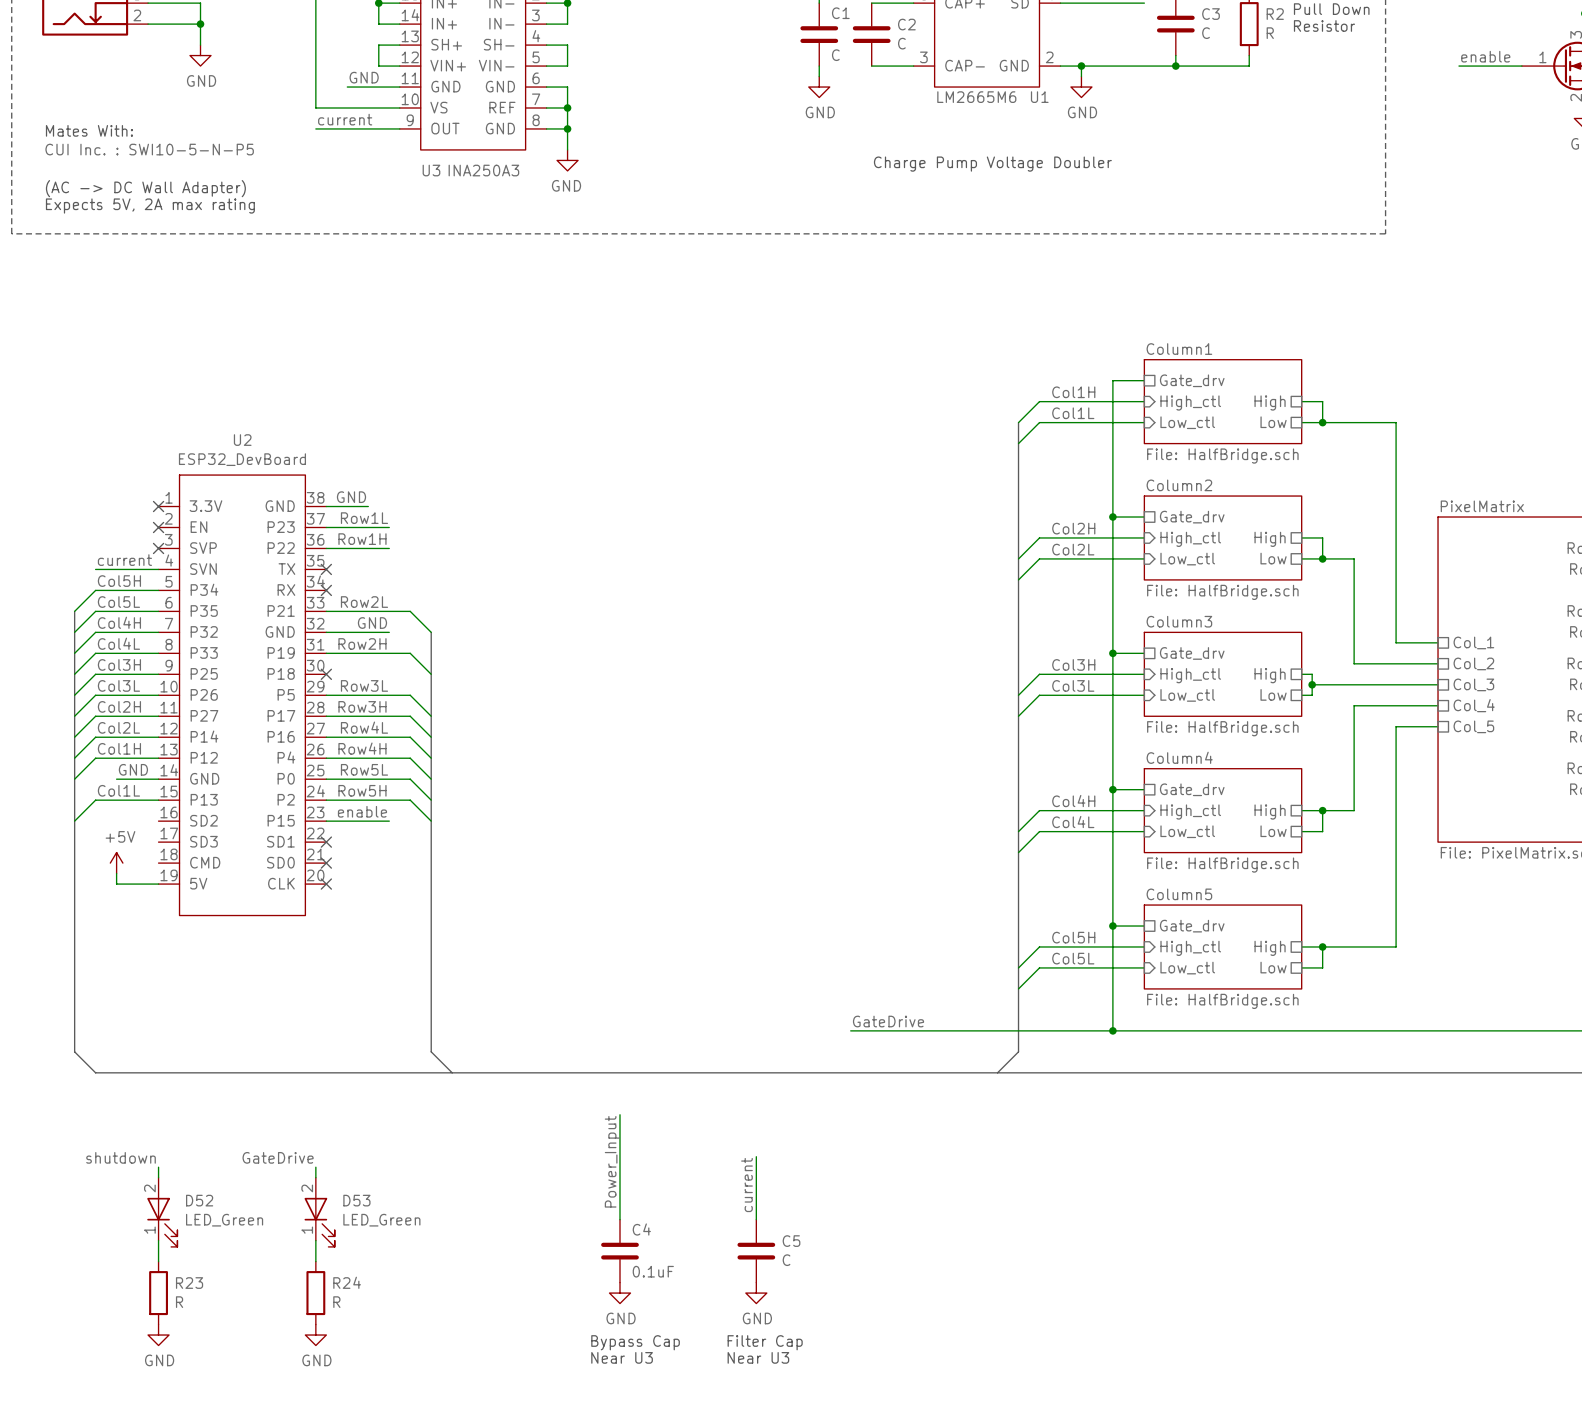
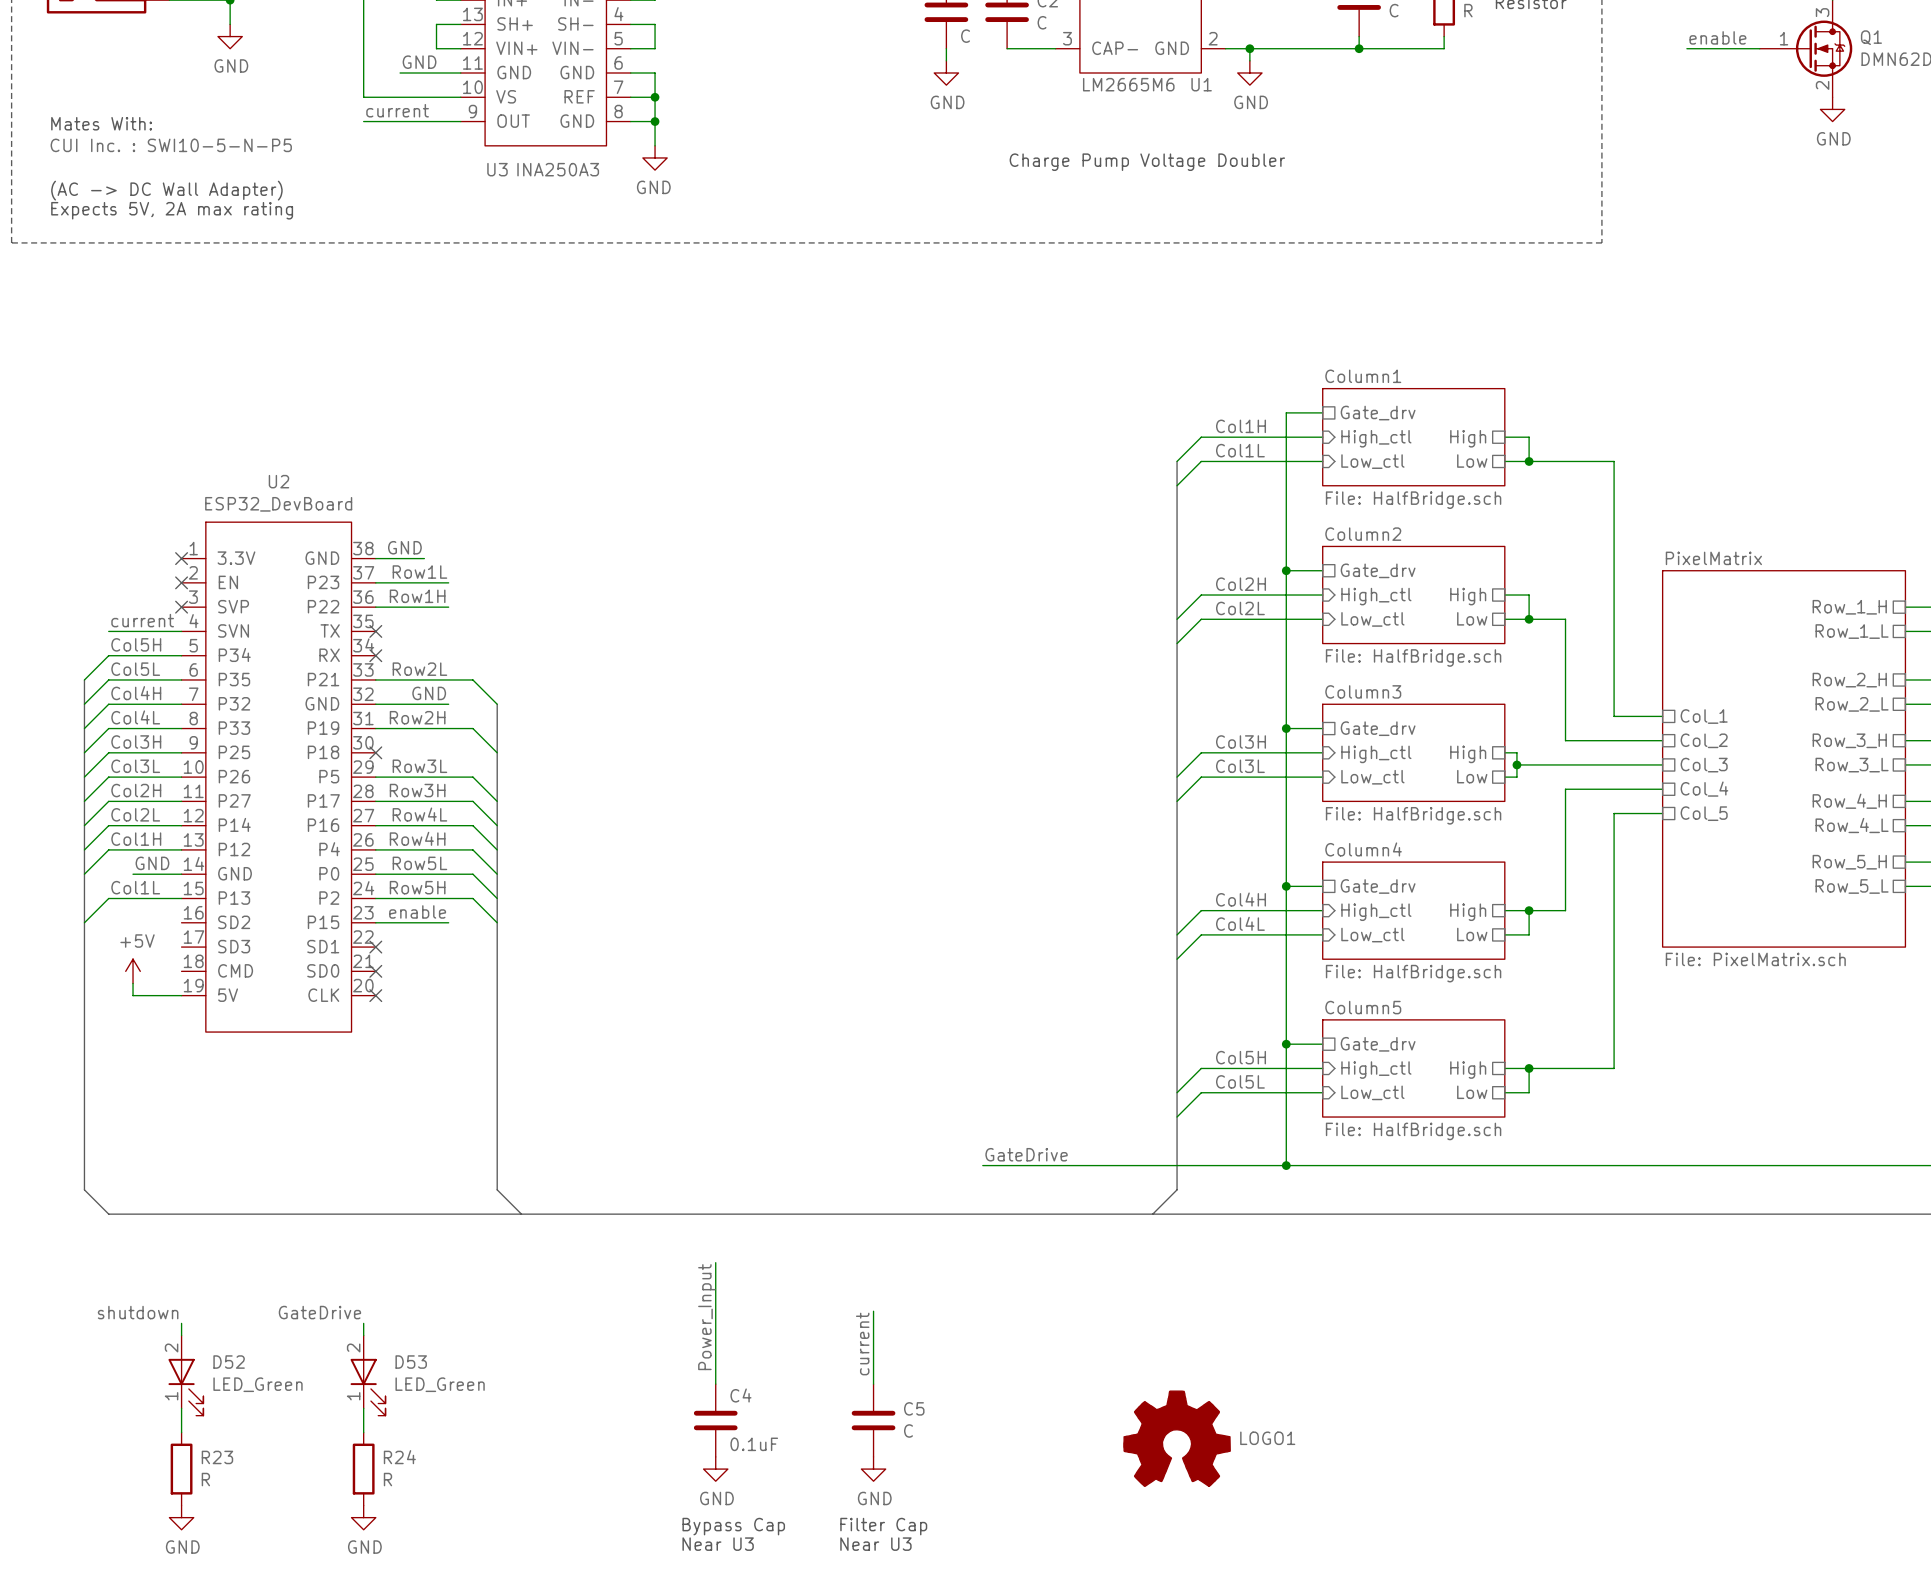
LOGO1: none -> (1177, 1438)

